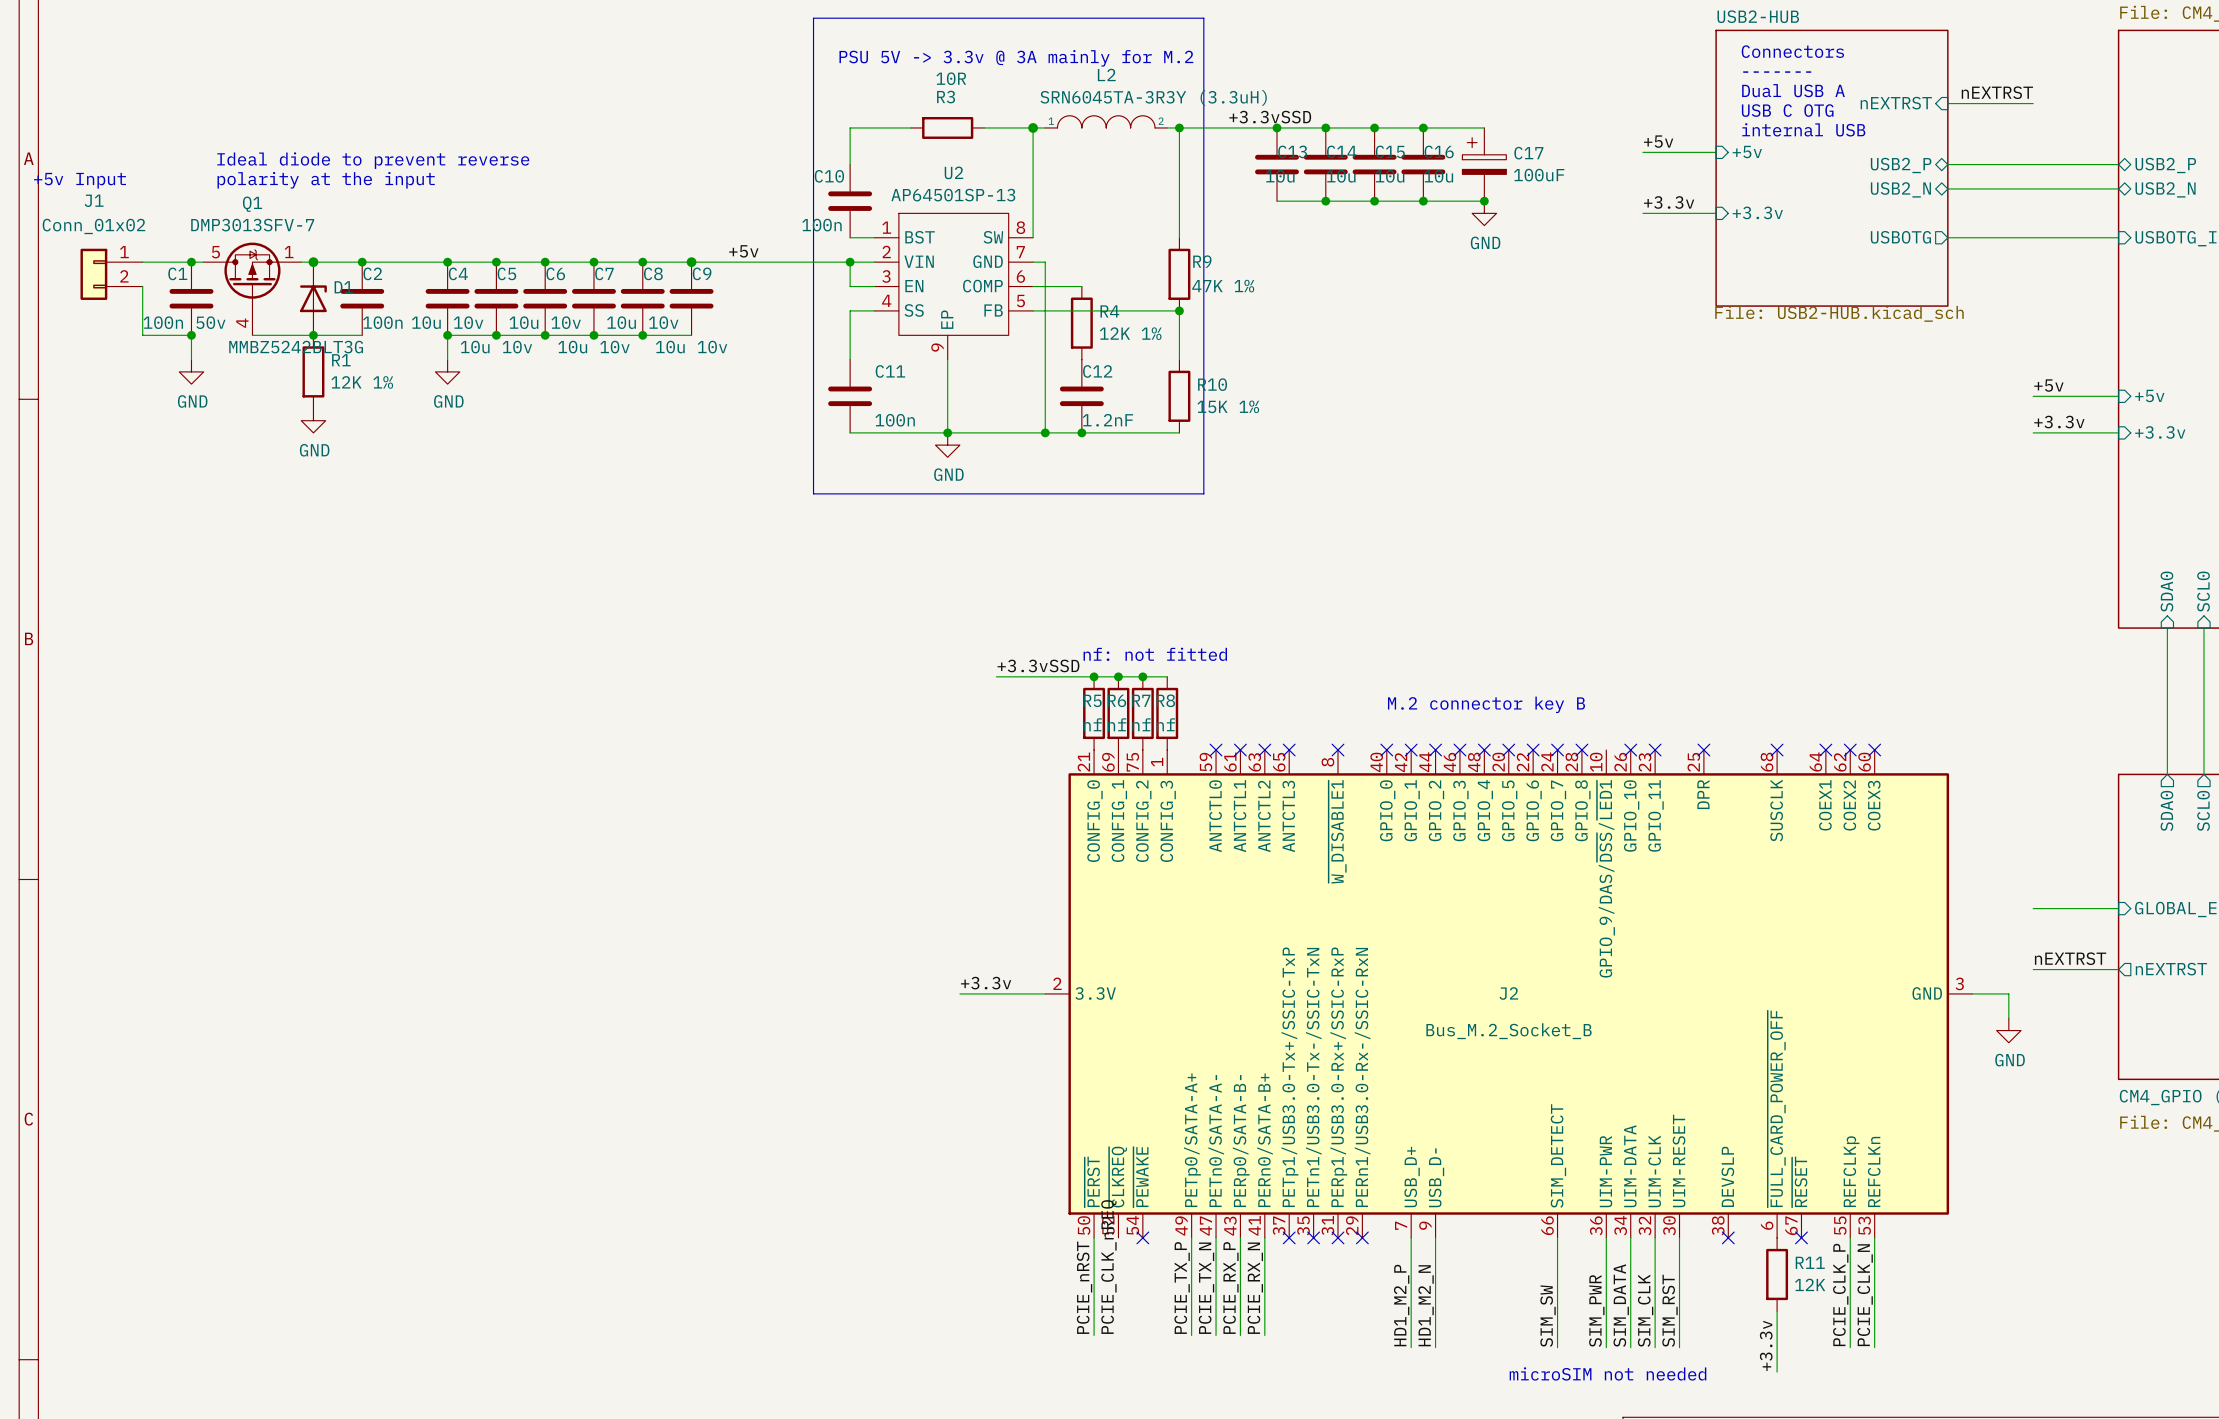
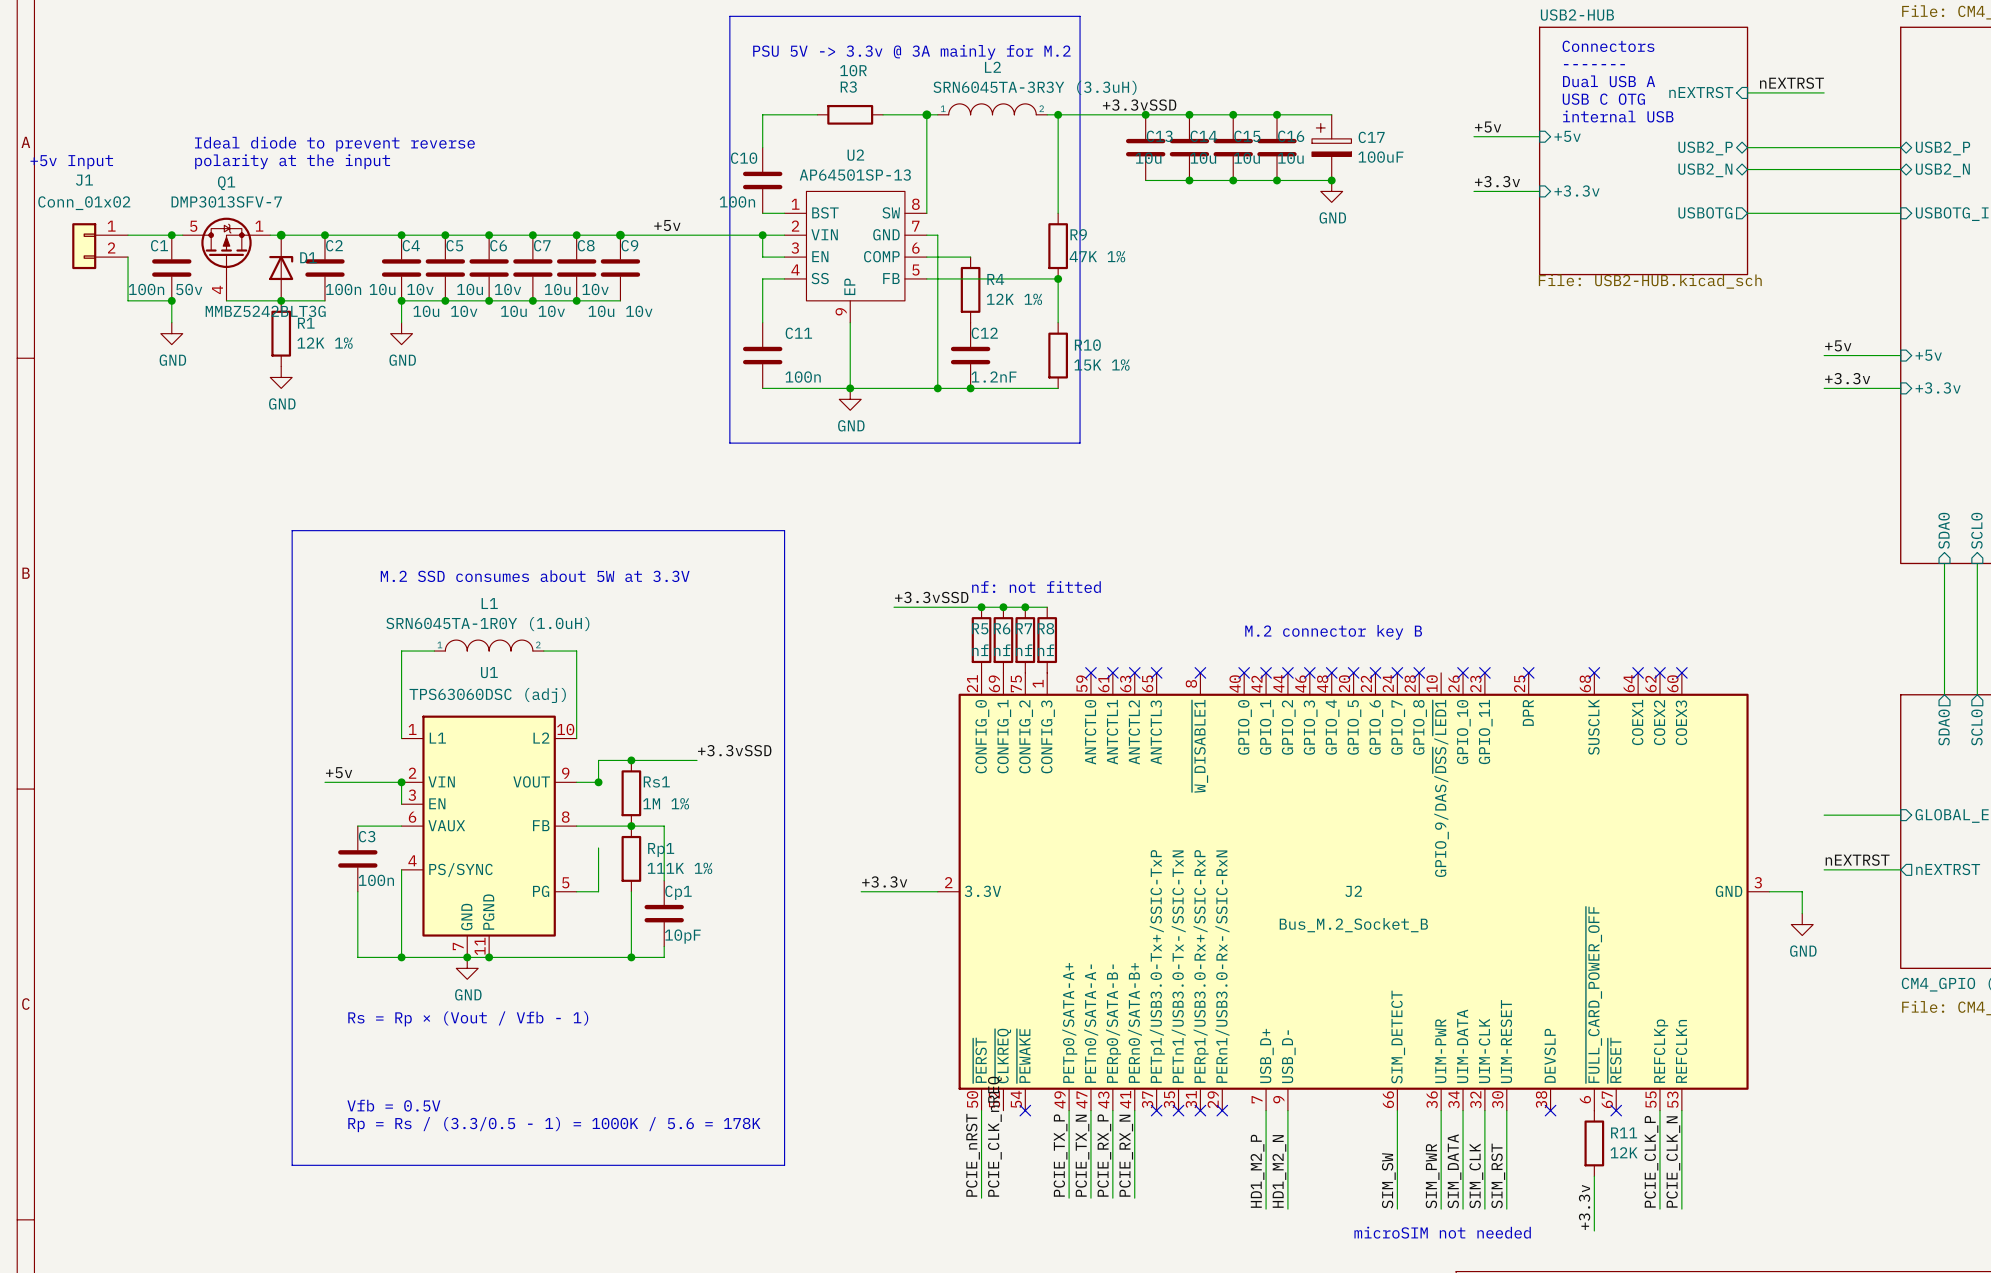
line: none -> (292, 530) (784, 530) (784, 1165) (292, 1165) (292, 530)
text: none -> M.2 SSD consumes about 5W at 3.3V (535, 576)
L1: none -> SRN6045TA-1R0Y (1.0uH) (489, 645)
wire: none -> (434, 651) (401, 651) (401, 738)
wire: none -> (543, 651) (576, 651) (576, 738)
label: none -> +3.3vSSD (734, 750)
junction: none -> (631, 760)
wire: none -> (697, 760) (598, 760) (598, 782) (576, 782)
label: none -> +5v (339, 772)
wire: none -> (324, 782) (401, 782) (401, 804)
junction: none -> (401, 782)
junction: none -> (598, 782)
Rs1: none -> 1M 1% (631, 793)
wire: none -> (357, 826) (401, 826)
wire: none -> (576, 826) (664, 826) (664, 880)
junction: none -> (631, 826)
U1: none -> TPS63060DSC (adj) (489, 836)
wire: none -> (598, 847) (598, 891) (576, 891)
C3: none -> 100n (357, 858)
Rp1: none -> 111K 1% (631, 858)
wire: none -> (401, 869) (401, 957)
wire: none -> (357, 891) (357, 957) (664, 957) (664, 946)
wire: none -> (631, 891) (631, 957)
Cp1: none -> 10pF (664, 913)
junction: none -> (401, 957)
junction: none -> (467, 957)
junction: none -> (489, 957)
junction: none -> (631, 957)
power symbol: none -> GND (467, 968)
text: none -> Rs = Rp × (Vout / Vfb - 1) (468, 1018)
text: none -> Vfb = 0.5V (393, 1105)
text: none -> Rp = Rs / (3.3/0.5 - 1) = 1000K / 5.6 = 178K (554, 1124)

